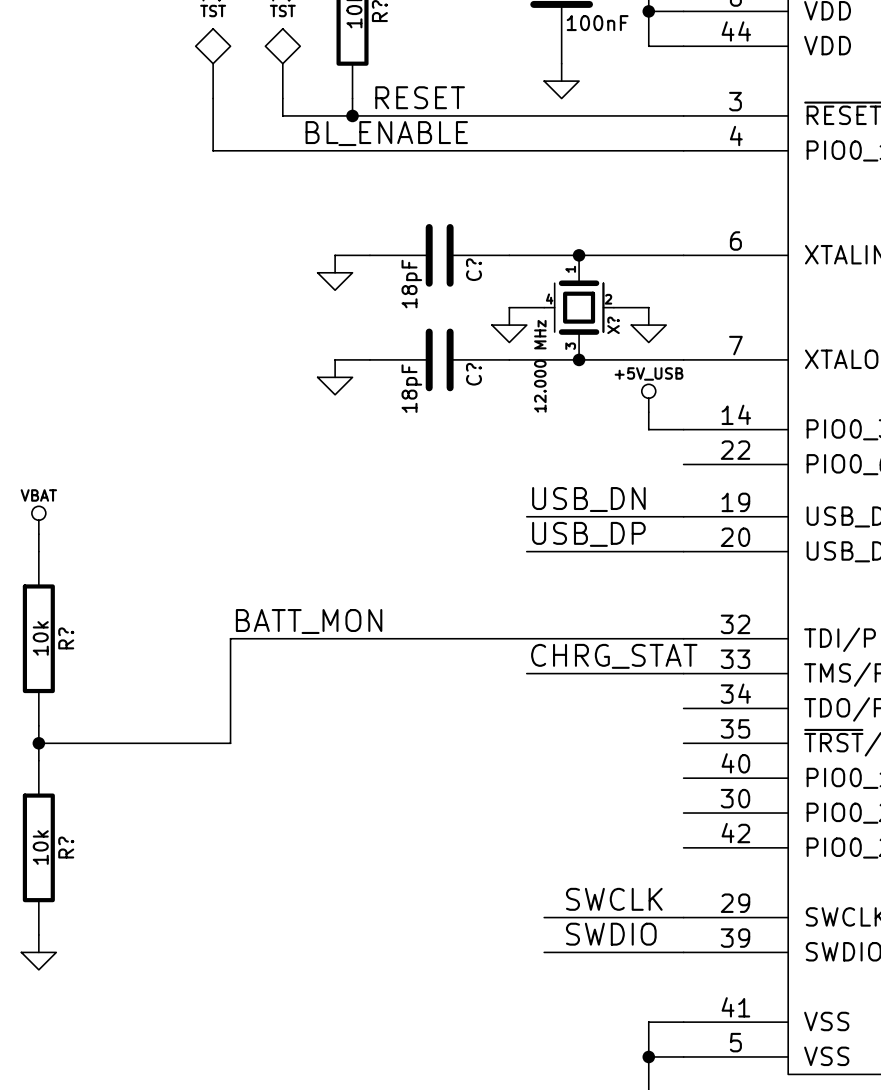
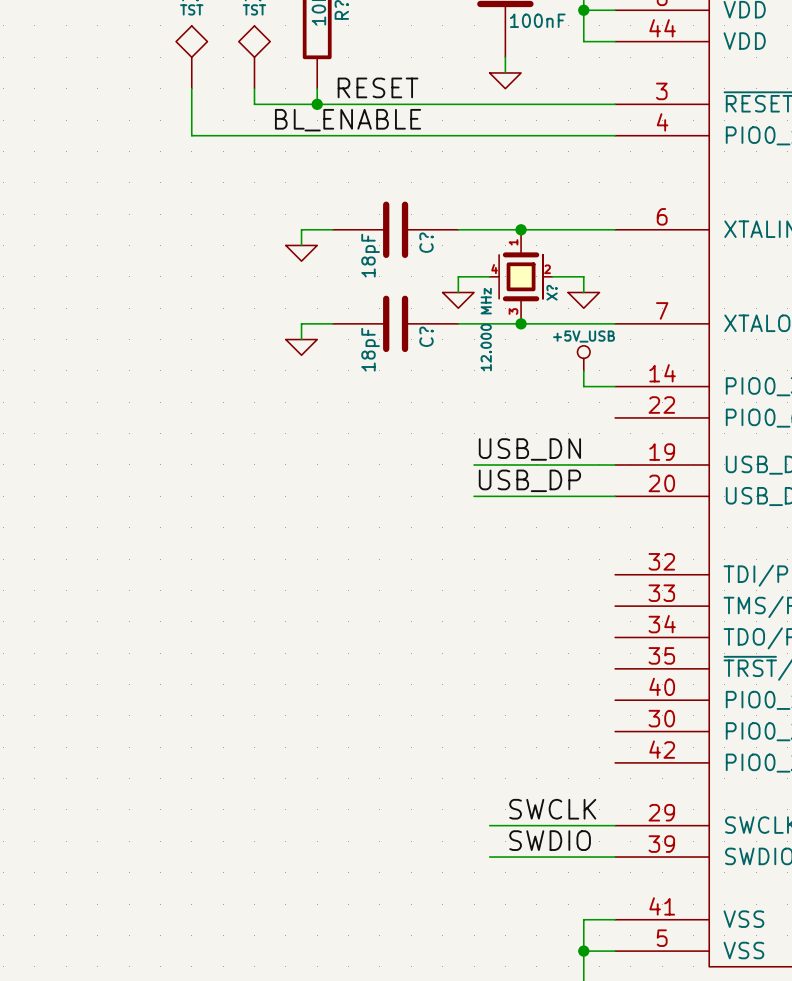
power symbol: VBAT (38, 520) -> none
wire: (38, 534) (38, 551) -> none
label: BATT_MON (309, 621) -> none
R?: 10k (38, 638) -> none
wire: (683, 638) (230, 638) (230, 743) (38, 743) -> none
label: CHRG_STAT (614, 656) -> none
wire: (526, 673) (683, 673) -> none
wire: (38, 725) (38, 760) -> none
junction: (38, 743) -> none
R?: 10k (38, 847) -> none
wire: (38, 934) (38, 952) -> none
power symbol: (38, 961) -> none

